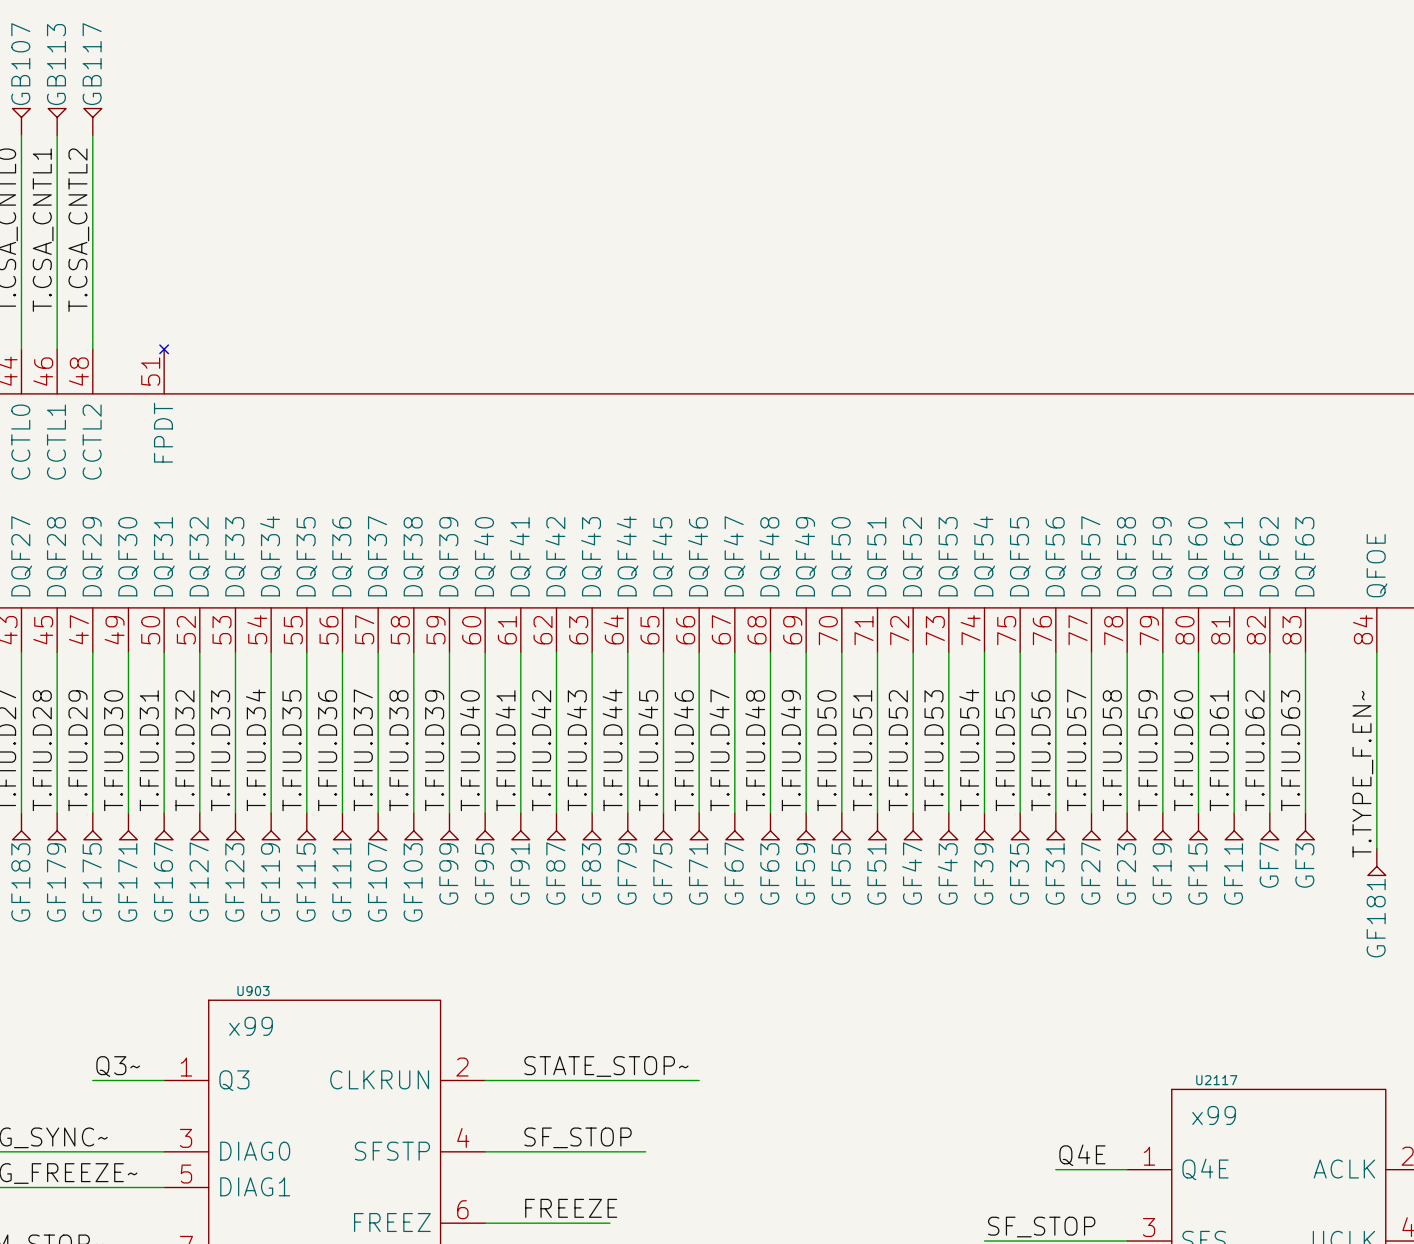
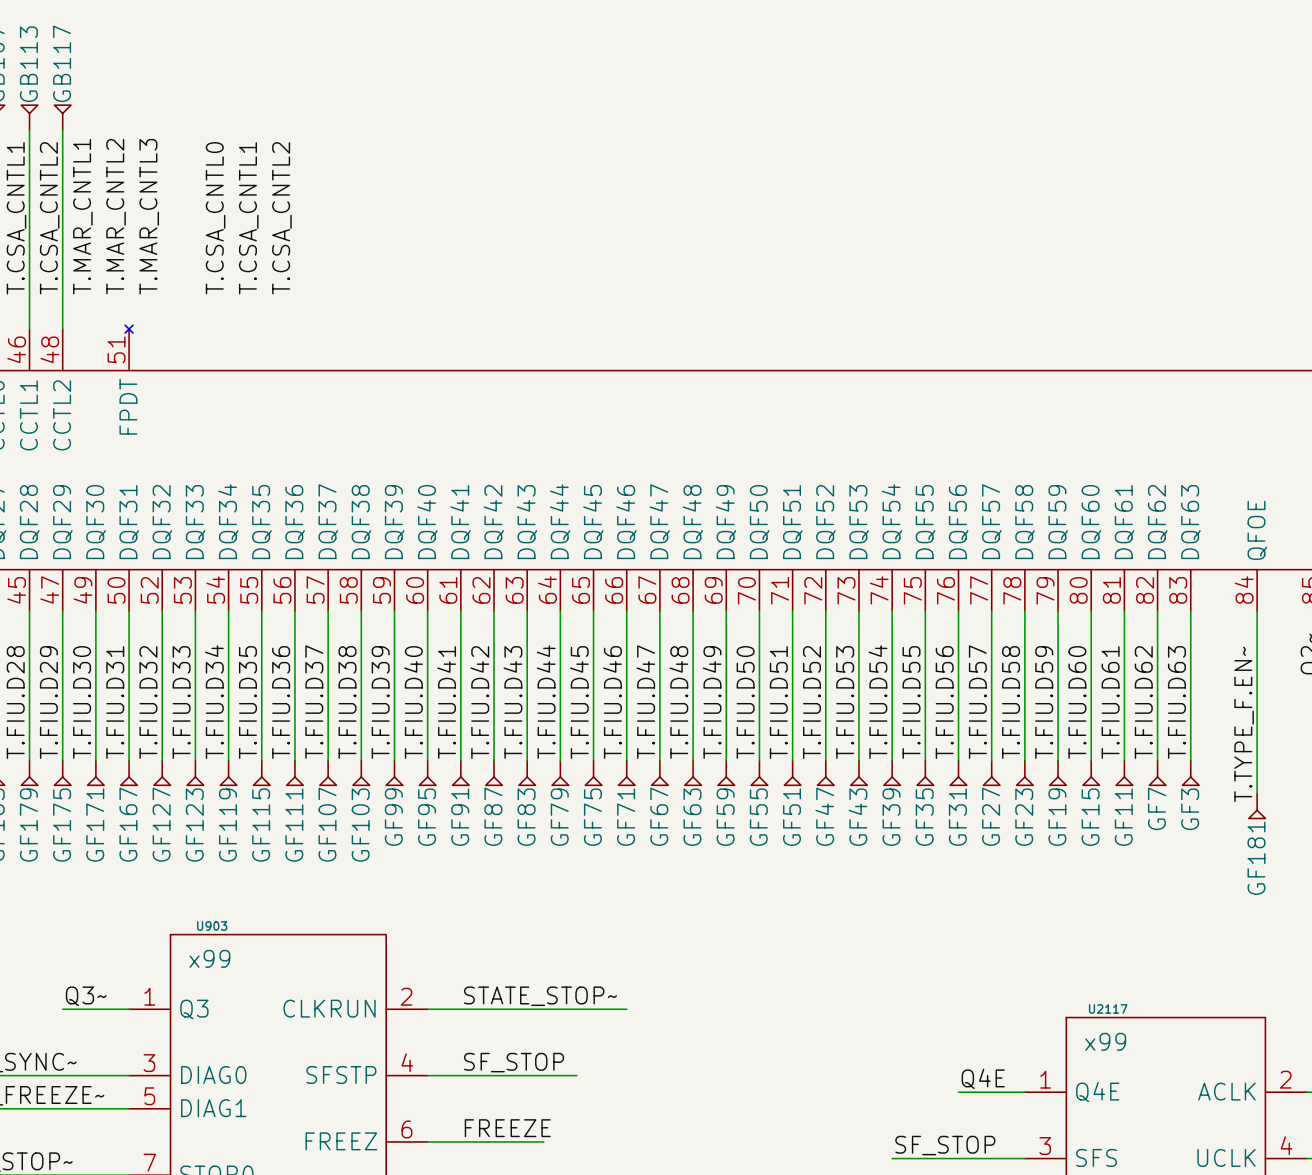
label: none -> T.MAR_CNTL1 (82, 216)
label: none -> T.MAR_CNTL2 (116, 216)
label: none -> T.MAR_CNTL3 (149, 216)
label: none -> T.CSA_CNTL0 (215, 218)
label: none -> T.CSA_CNTL1 (248, 218)
label: none -> T.CSA_CNTL2 (281, 218)

